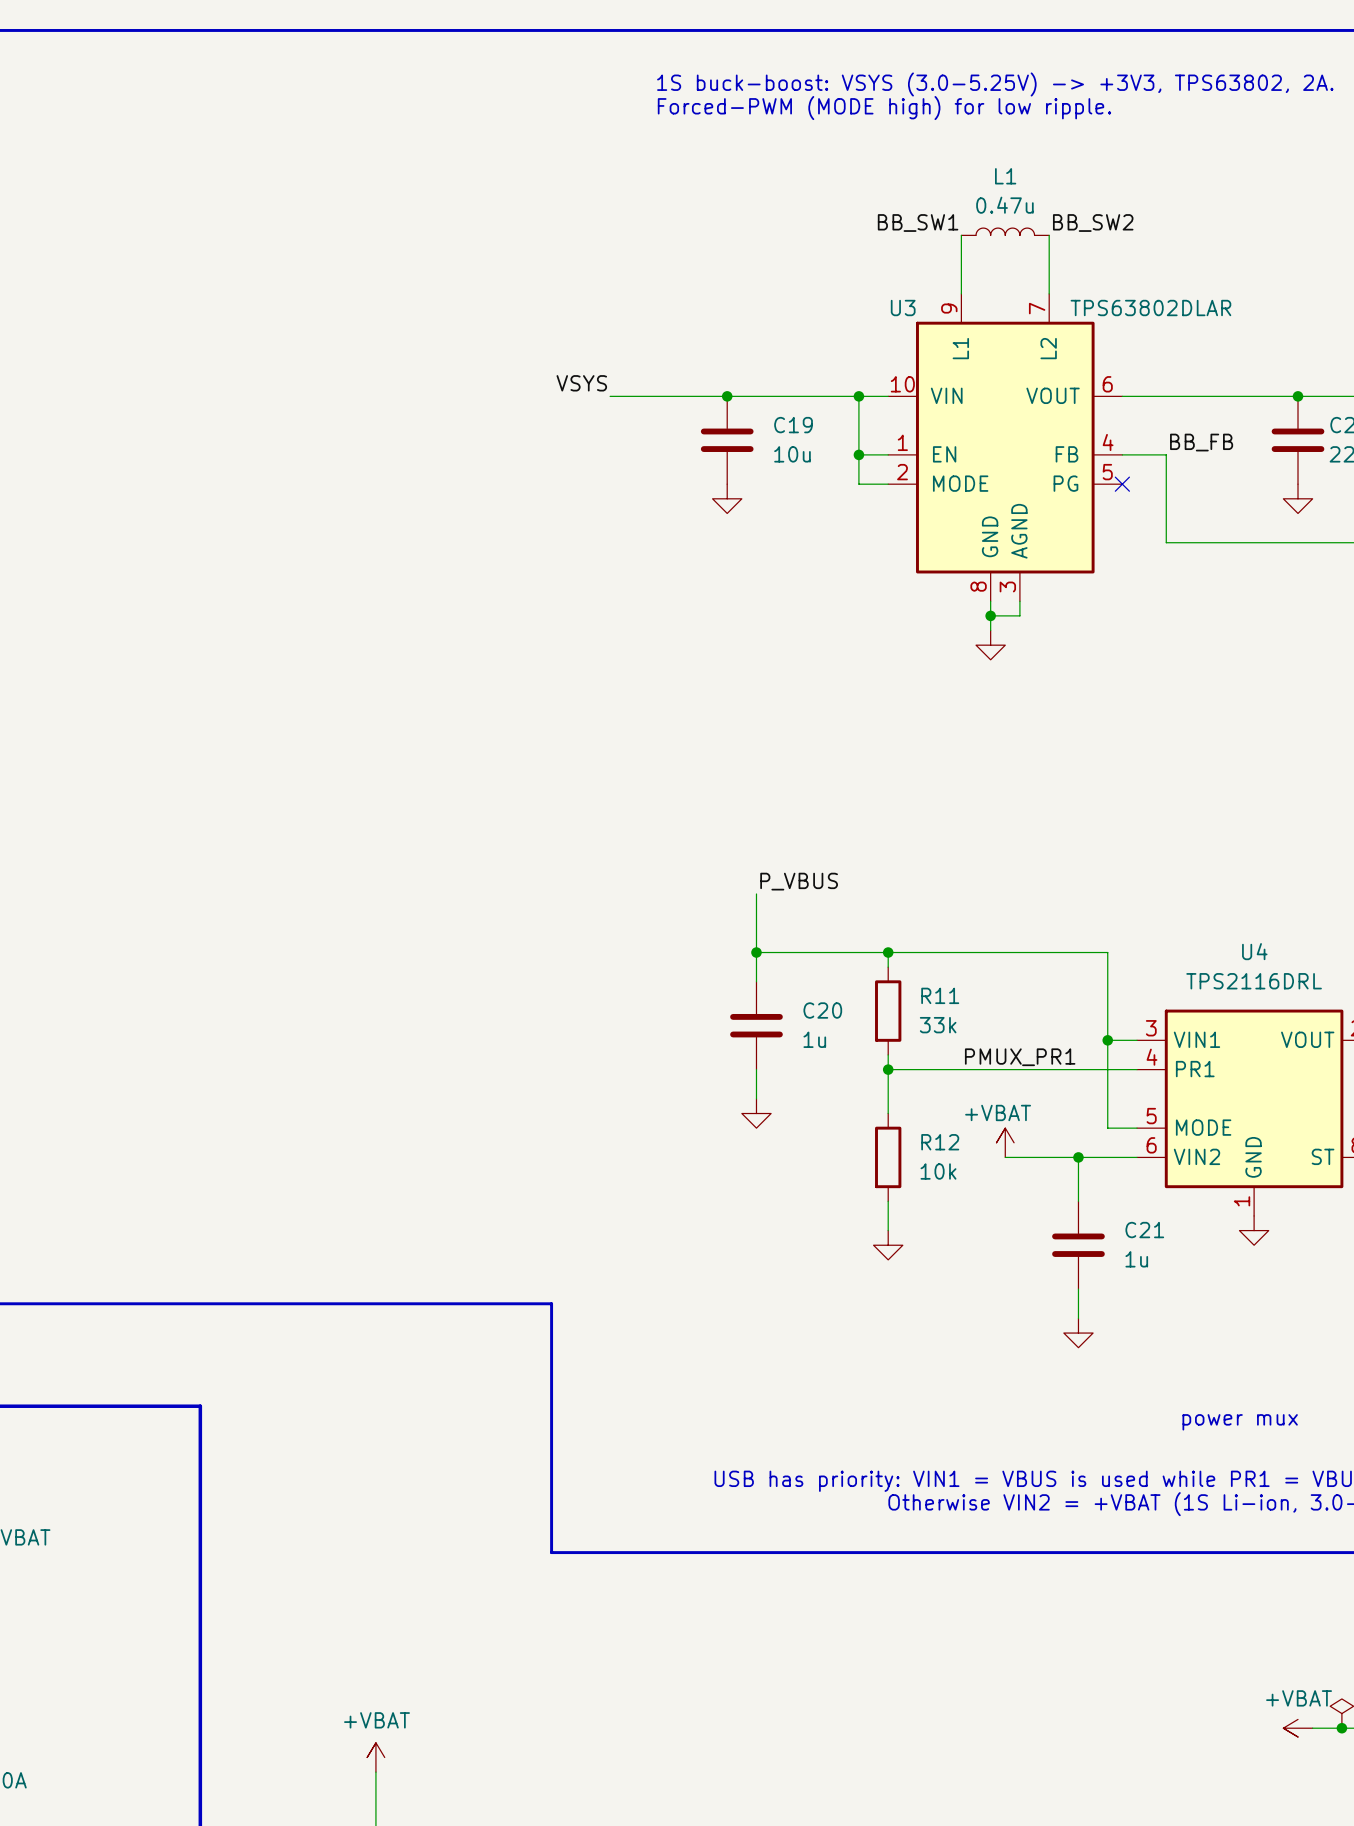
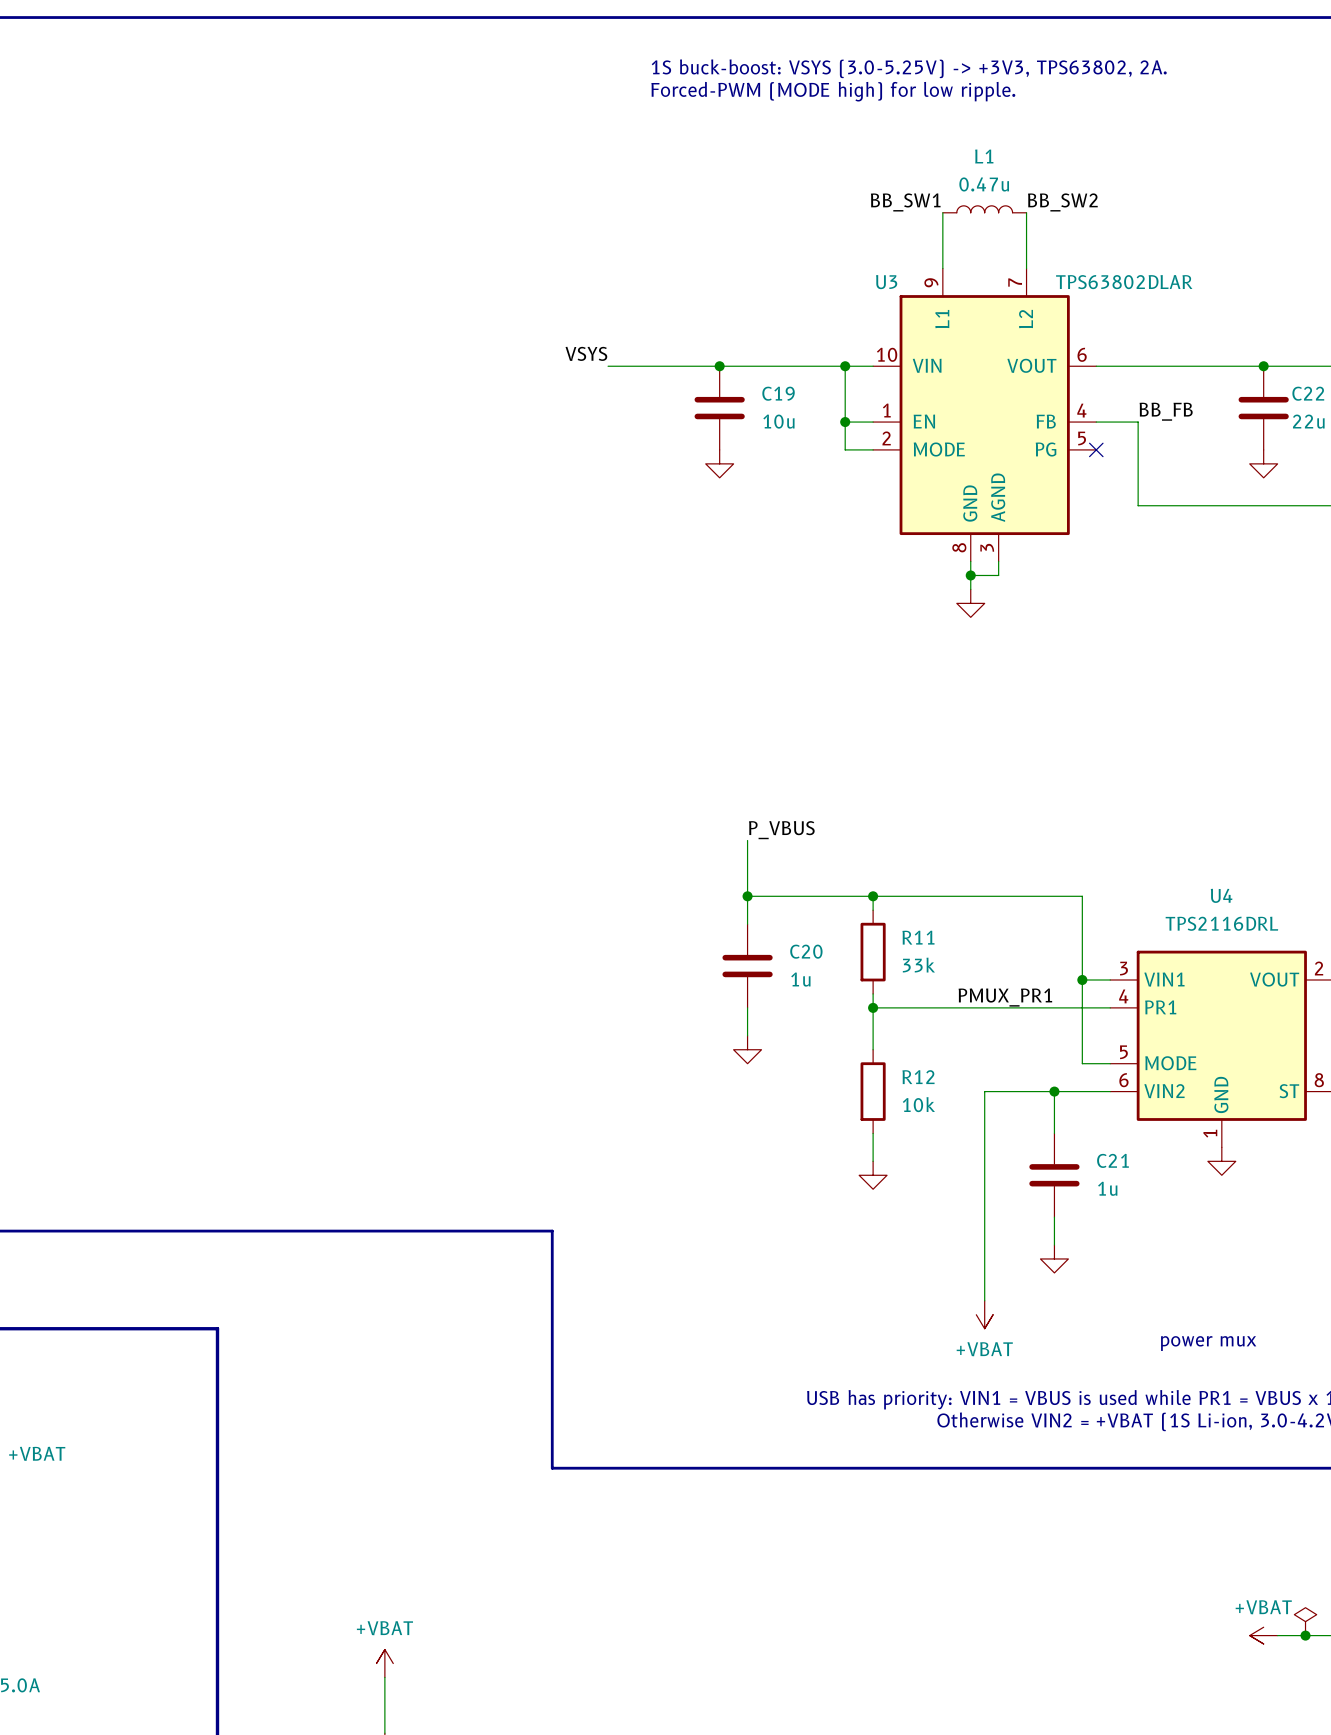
power symbol rotation: 0° (1005, 1142) -> 180° (984, 1314)
power symbol position: +VBAT (1005, 1142) -> +VBAT (984, 1314)
wire: none -> (984, 1091) (984, 1300)

